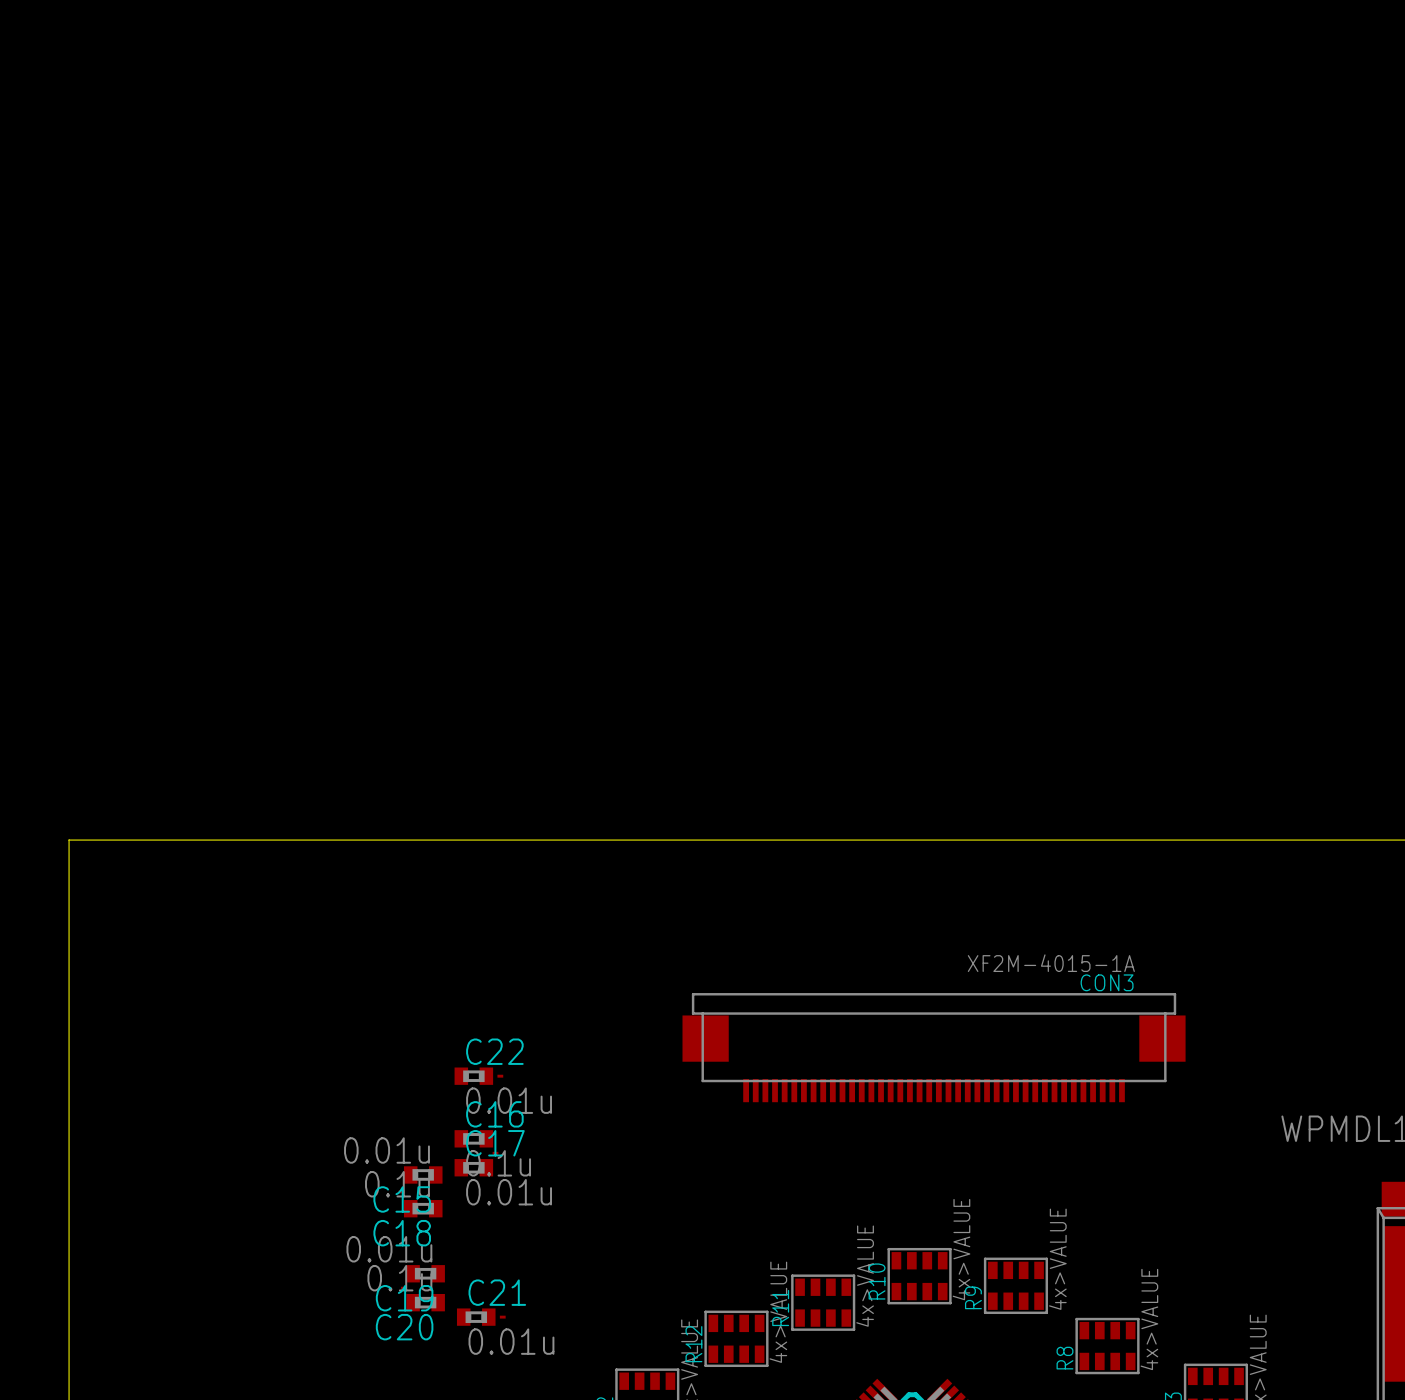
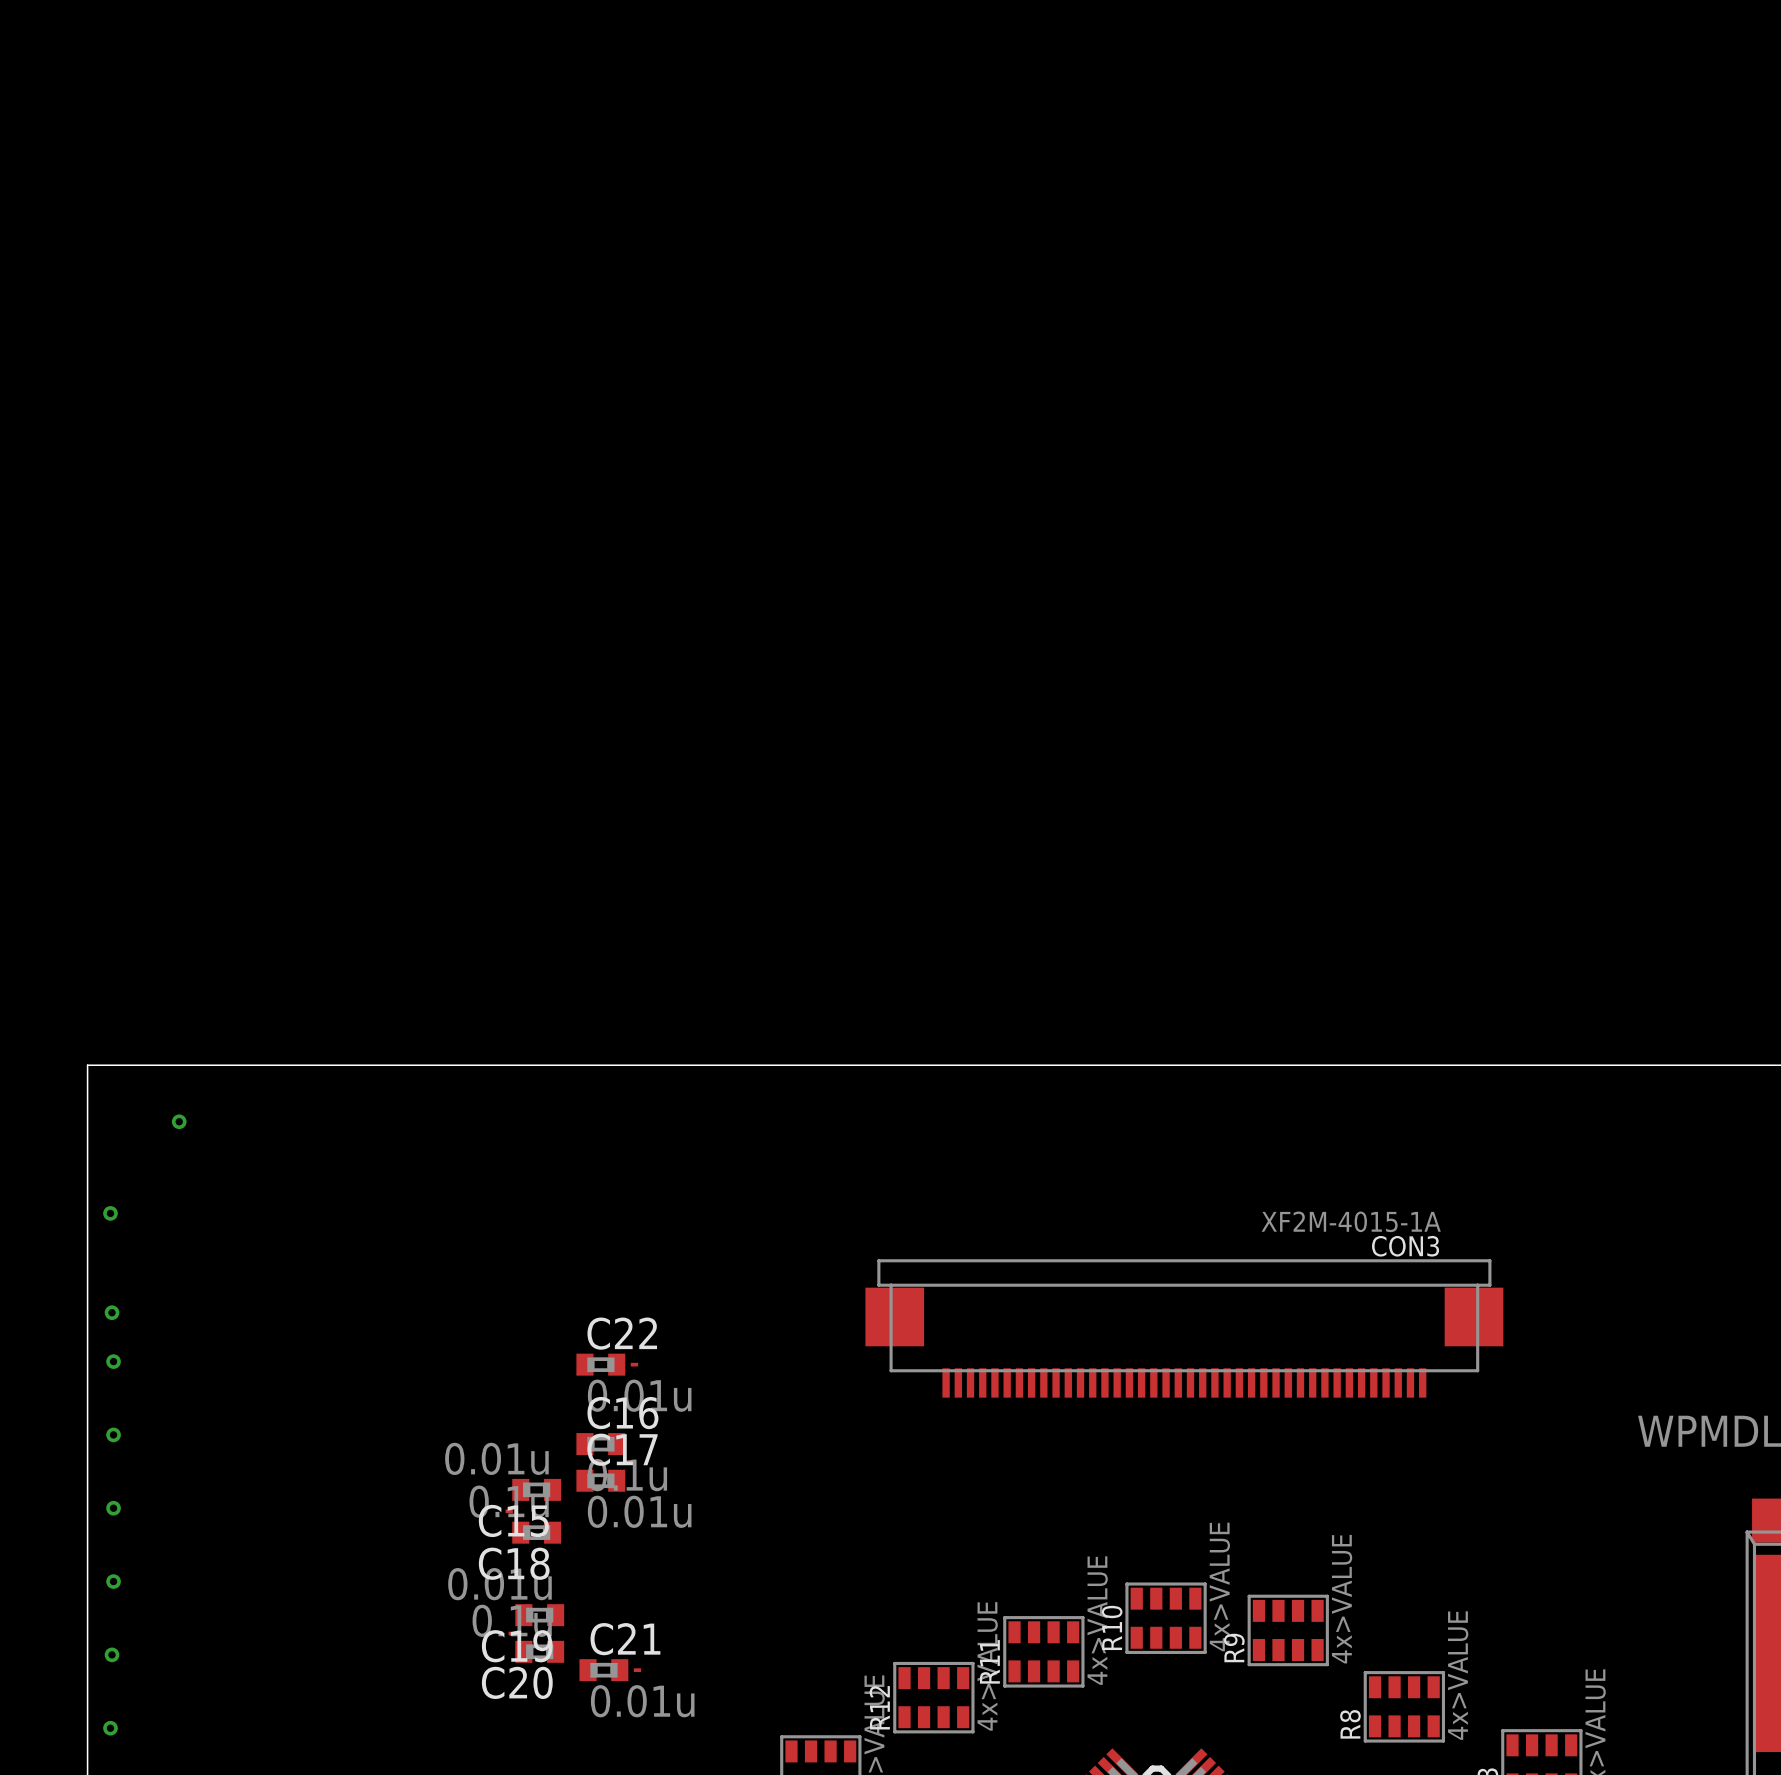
via: none -> (179, 1121)
via: none -> (110, 1213)
via: none -> (112, 1312)
via: none -> (113, 1361)
via: none -> (113, 1434)
via: none -> (113, 1508)
via: none -> (113, 1581)
via: none -> (112, 1654)
via: none -> (110, 1728)

